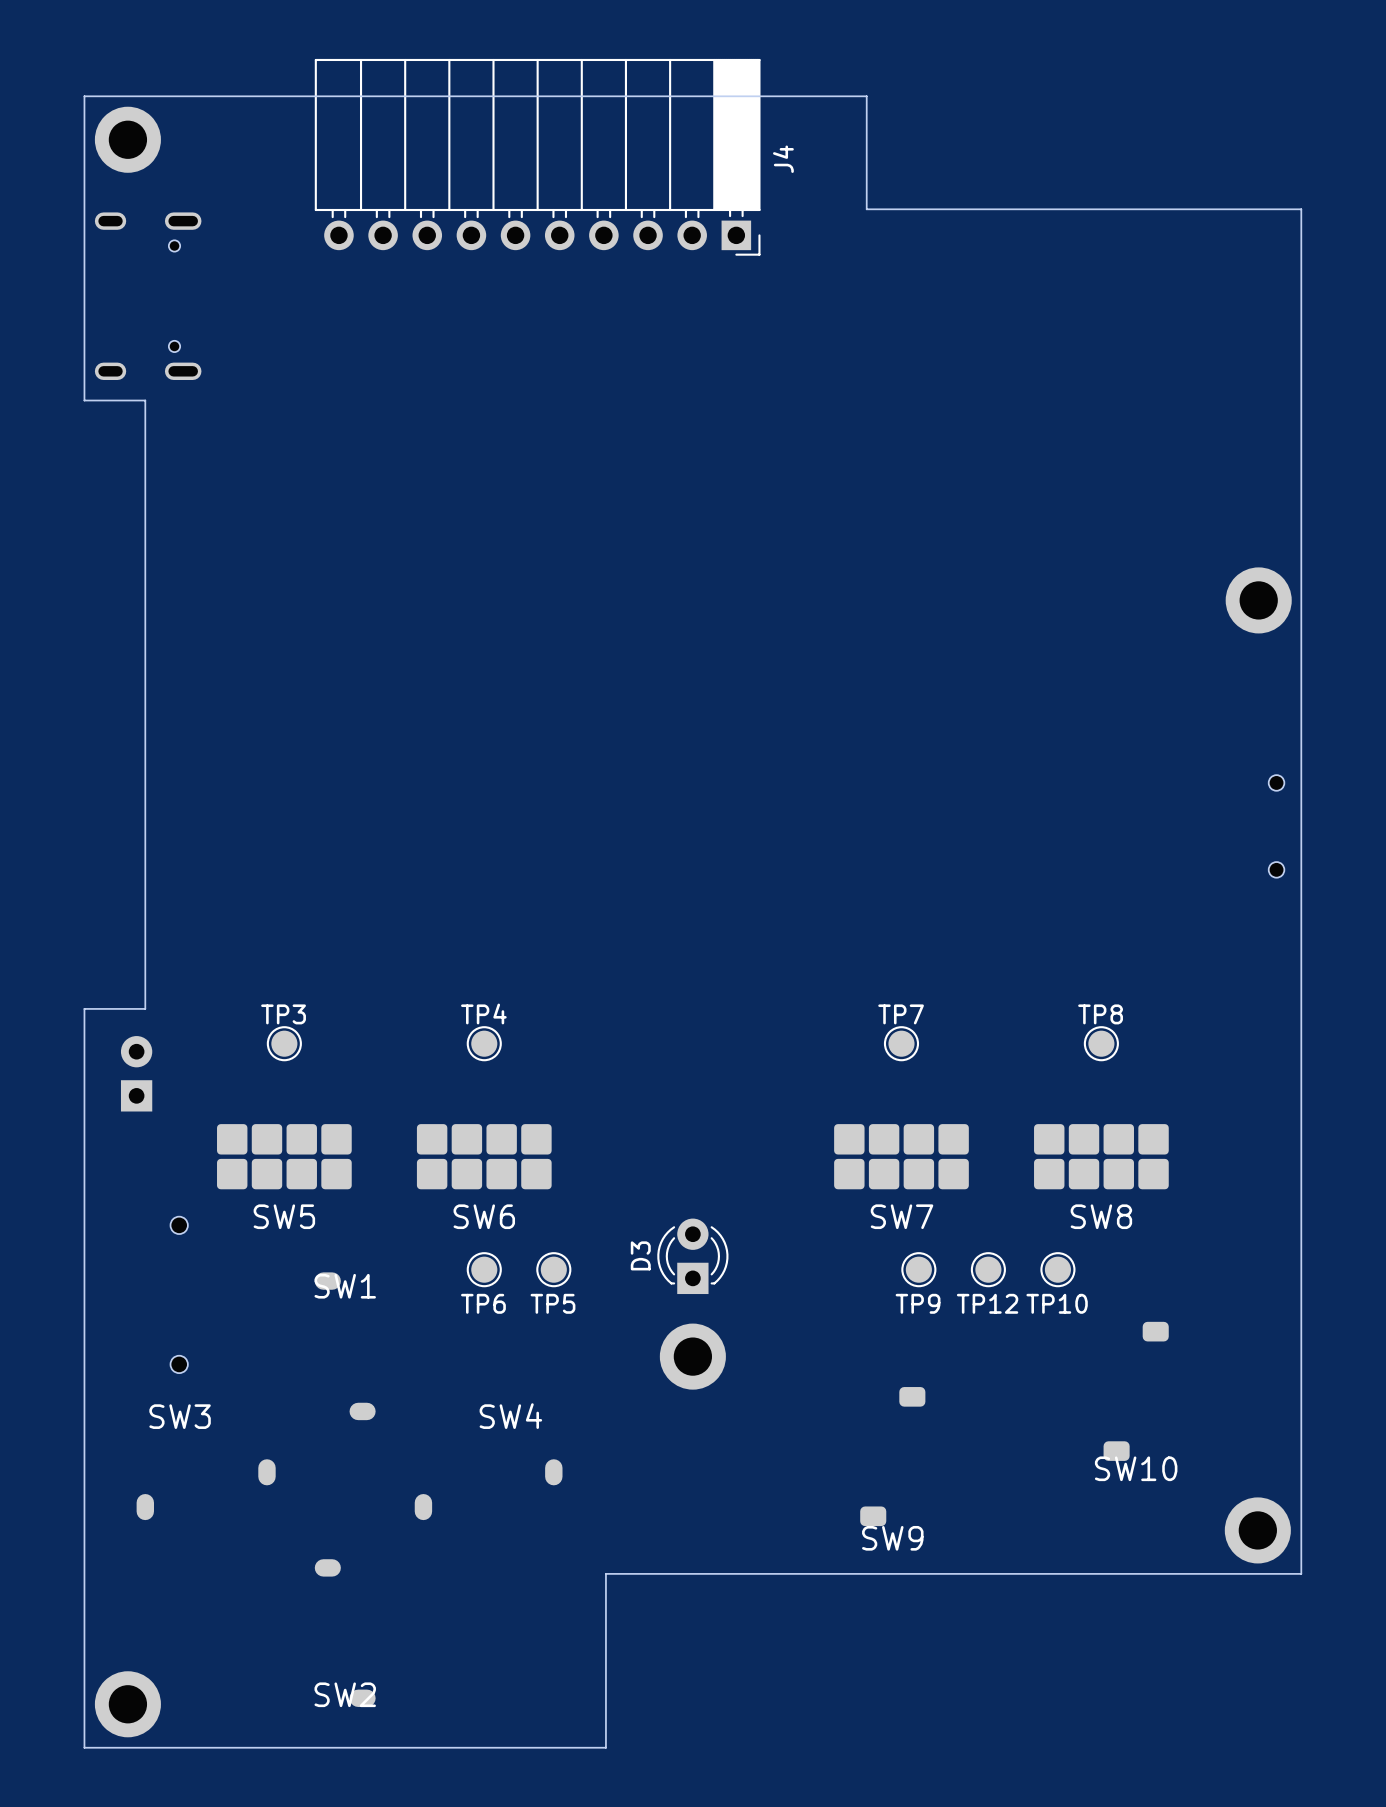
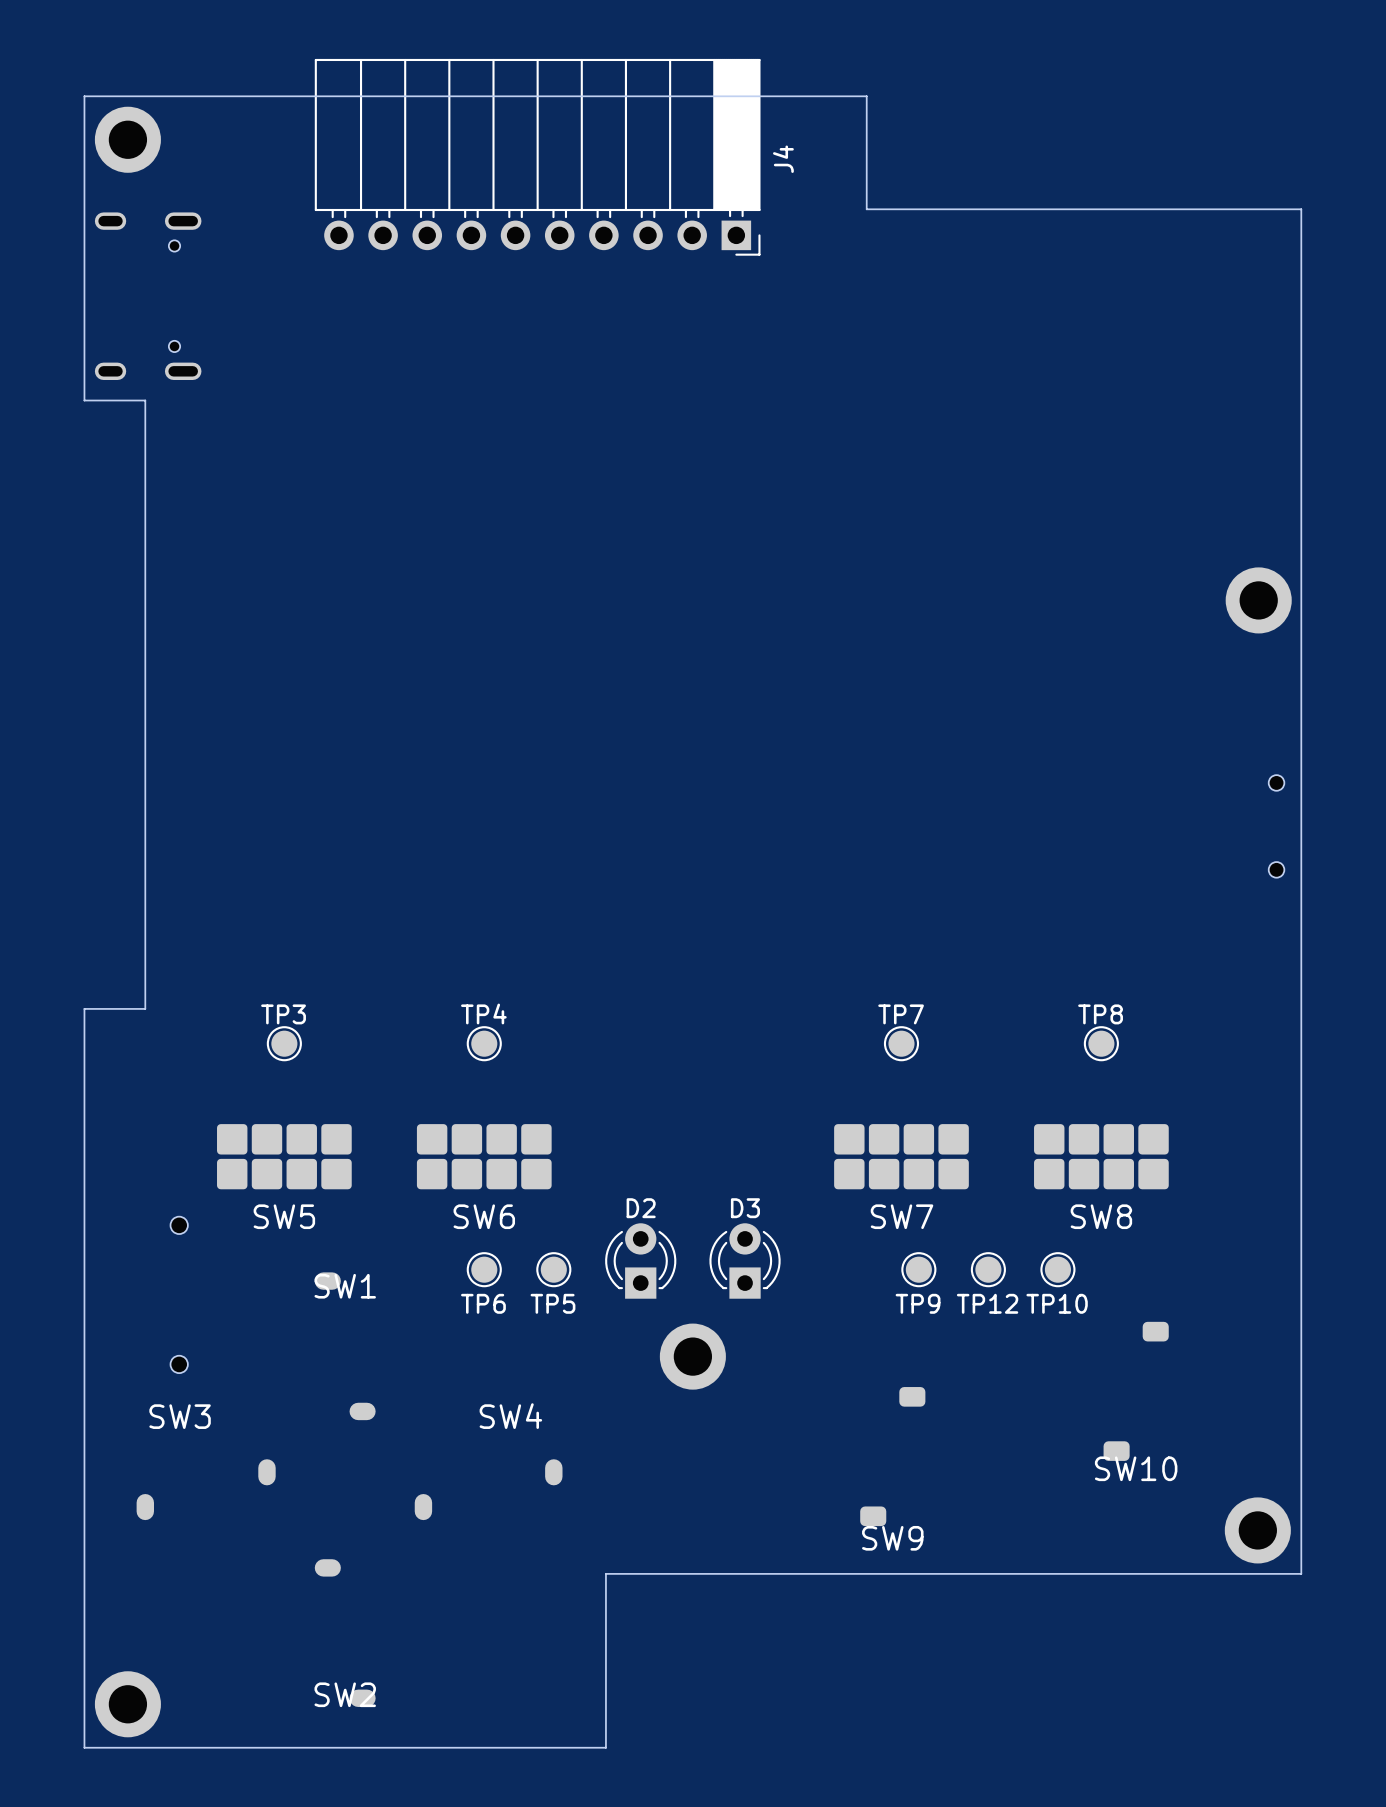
part: (136, 1073) -> none
D3 name rotation: 0° (640, 1255) -> 90° clockwise (745, 1208)
D3 name position: D3 (640, 1255) -> D3 (745, 1208)
D3 position: (692, 1256) -> (745, 1261)
D2: none -> (640, 1261)

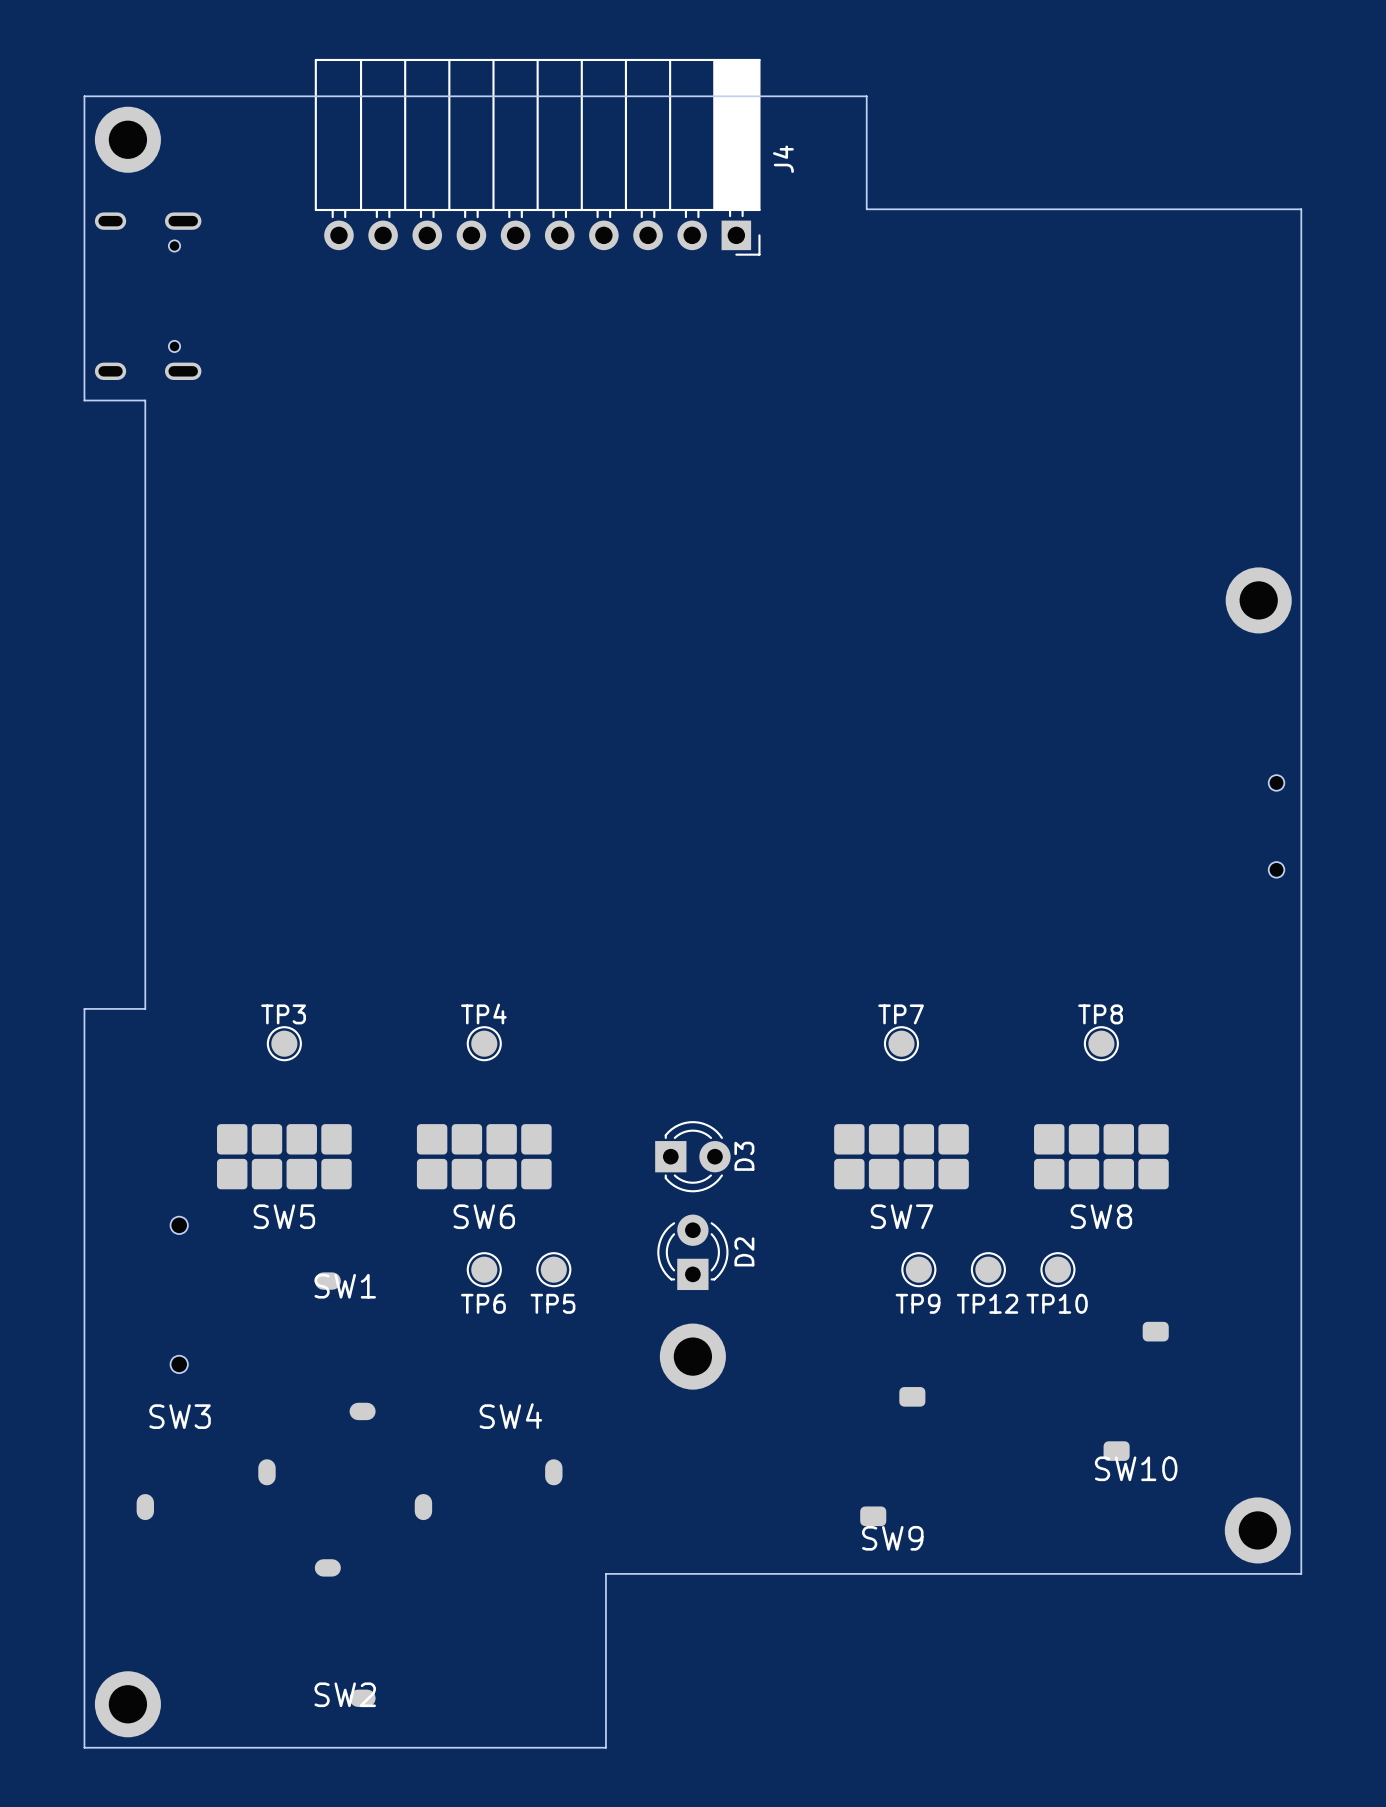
D2 name rotation: 0° (641, 1208) -> 90° counterclockwise (744, 1251)
D2 name position: D2 (641, 1208) -> D2 (744, 1251)
D2 position: (640, 1261) -> (692, 1252)
D3 rotation: 0° (745, 1261) -> 90° clockwise (692, 1156)
D3 position: (745, 1261) -> (692, 1156)

